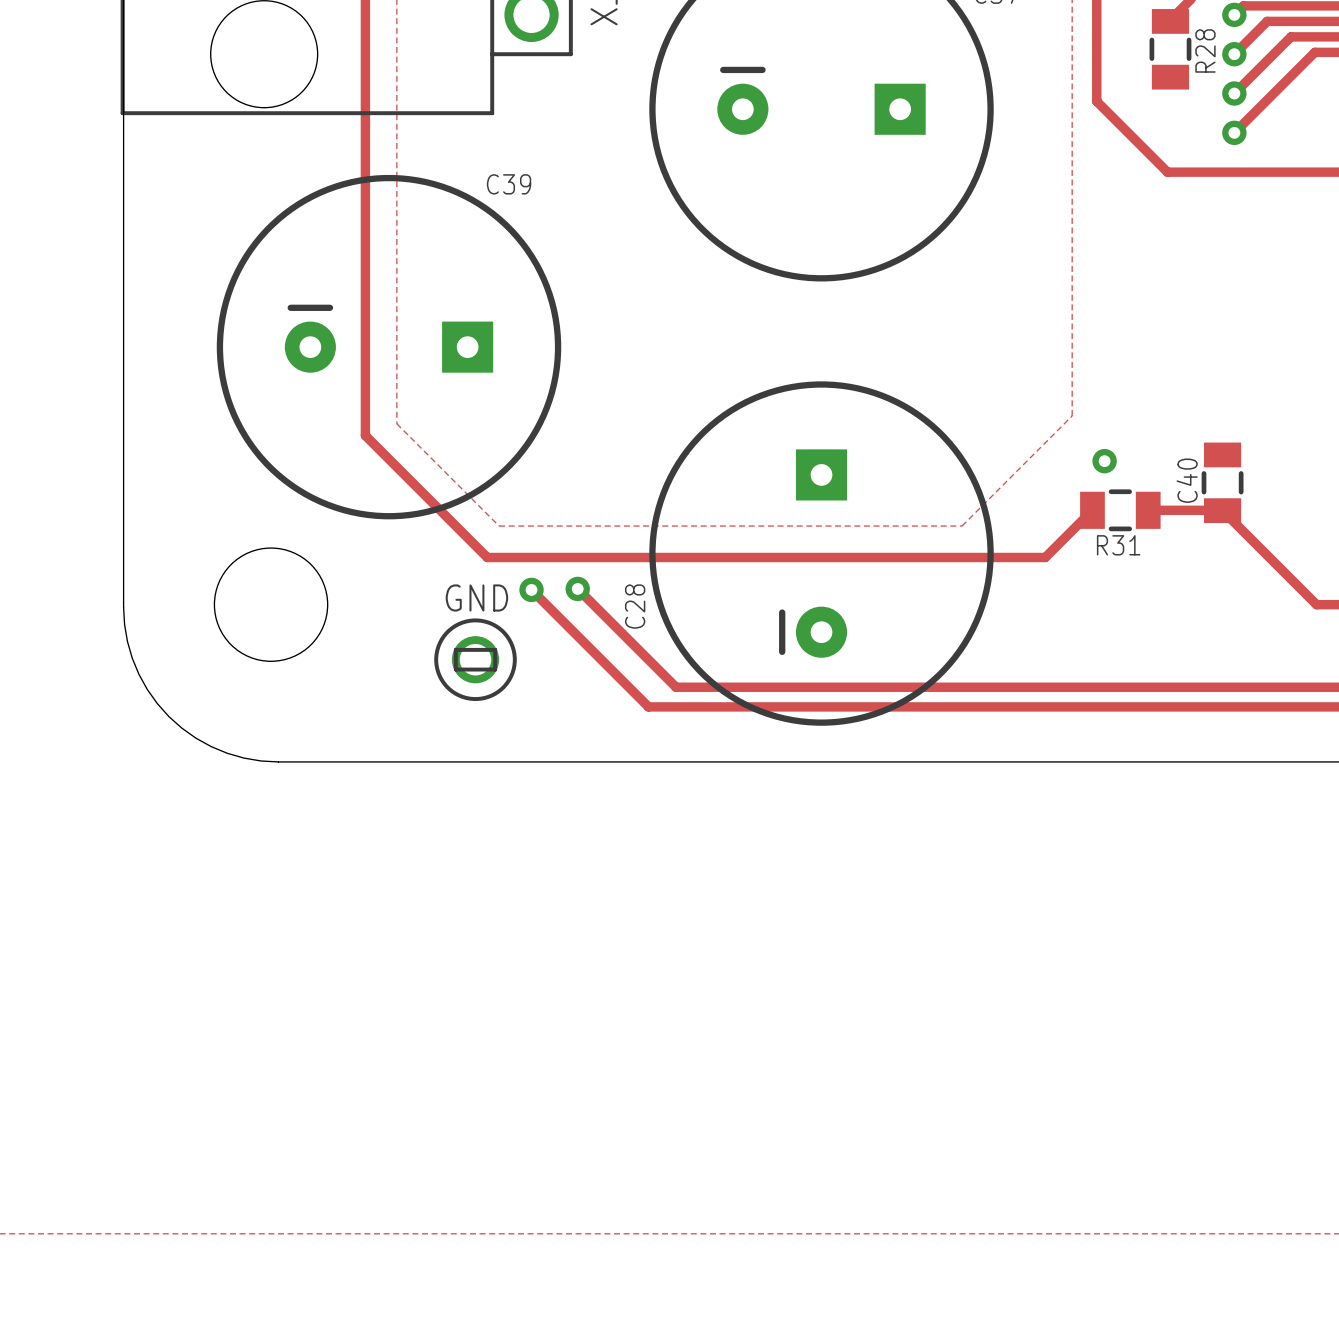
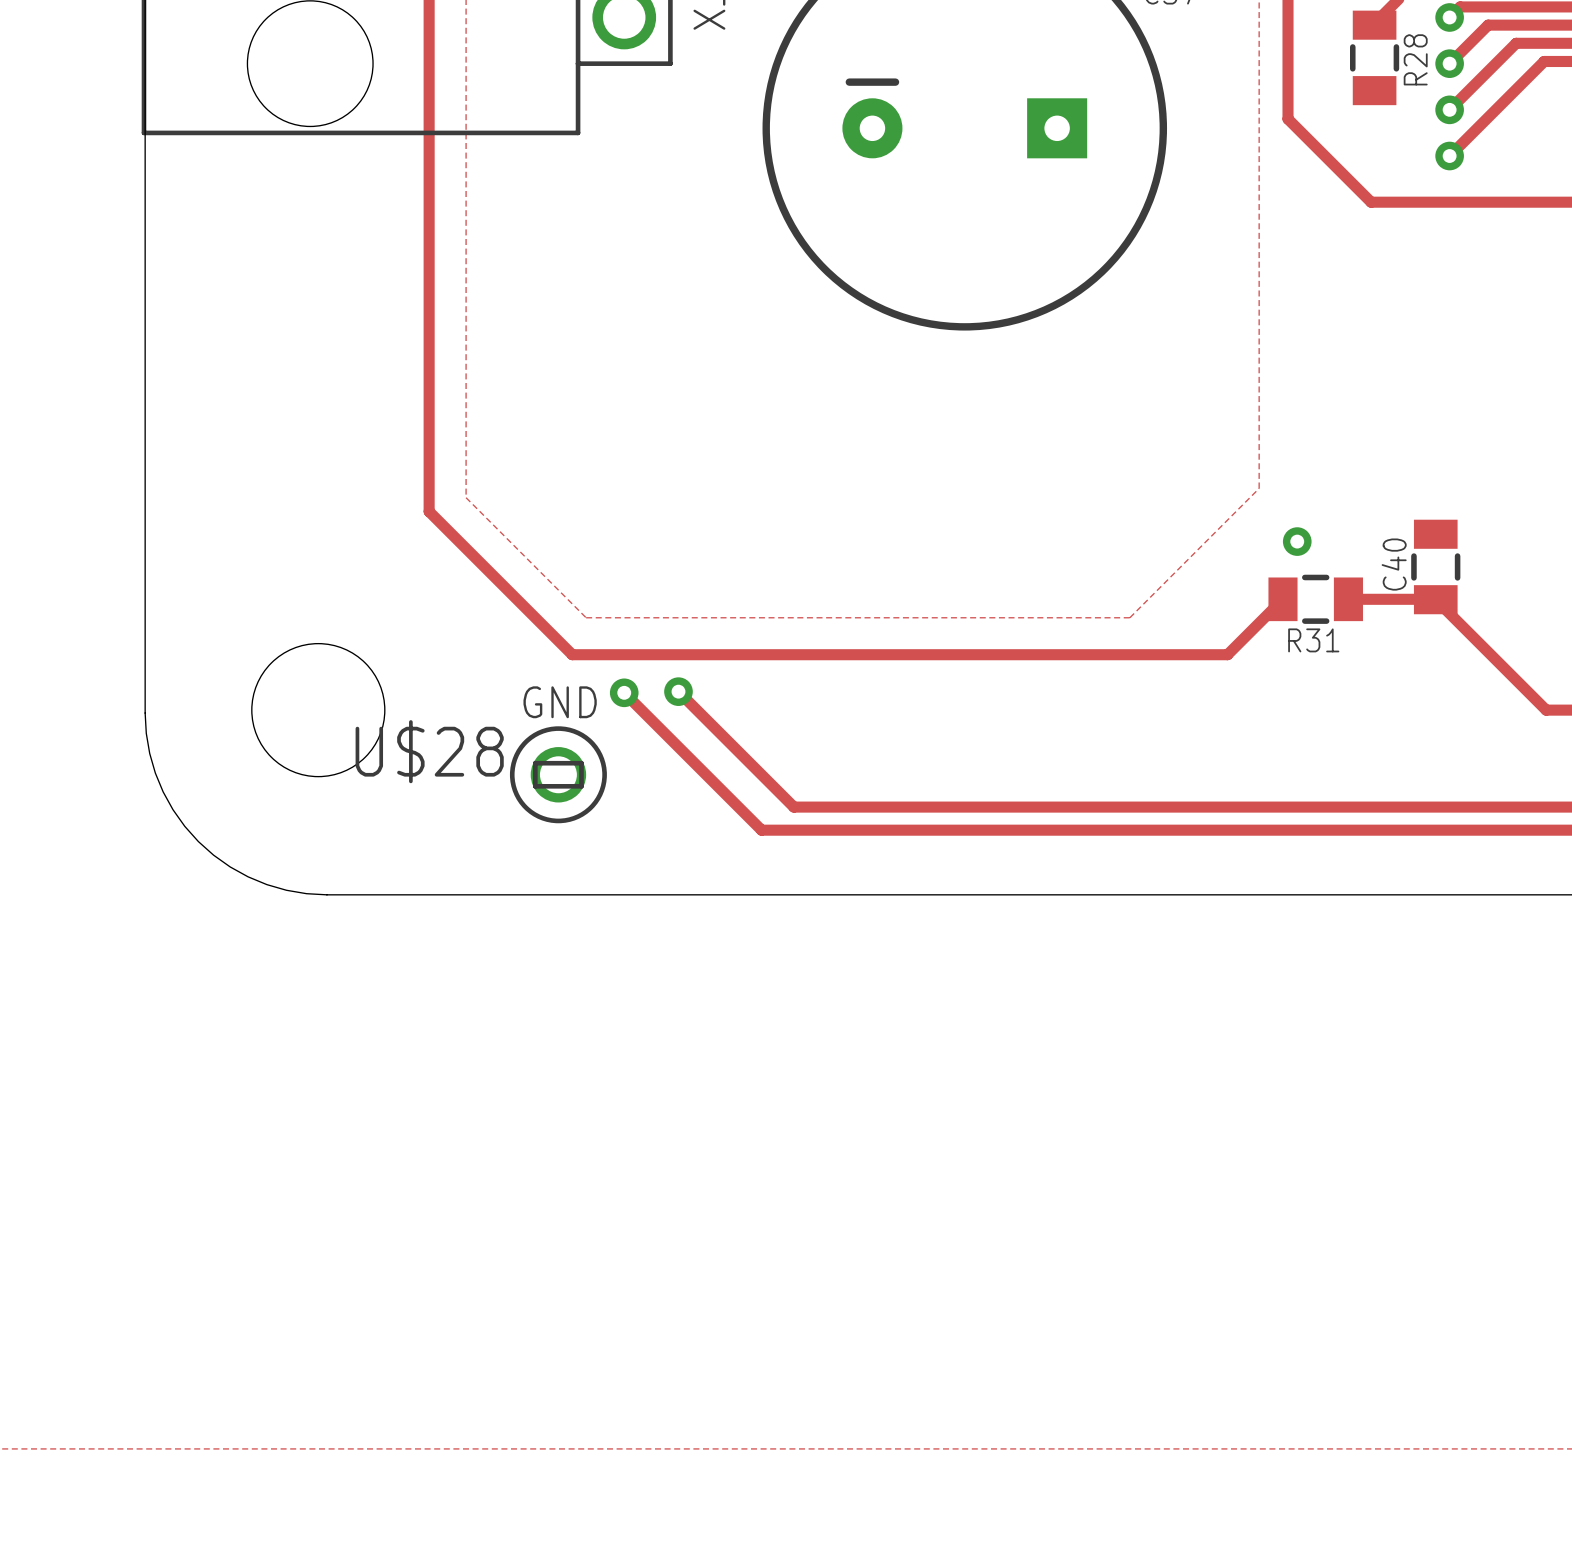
C39: (389, 347) -> none
C28: (821, 553) -> none
U$28 name: none -> U$28 (429, 751)

